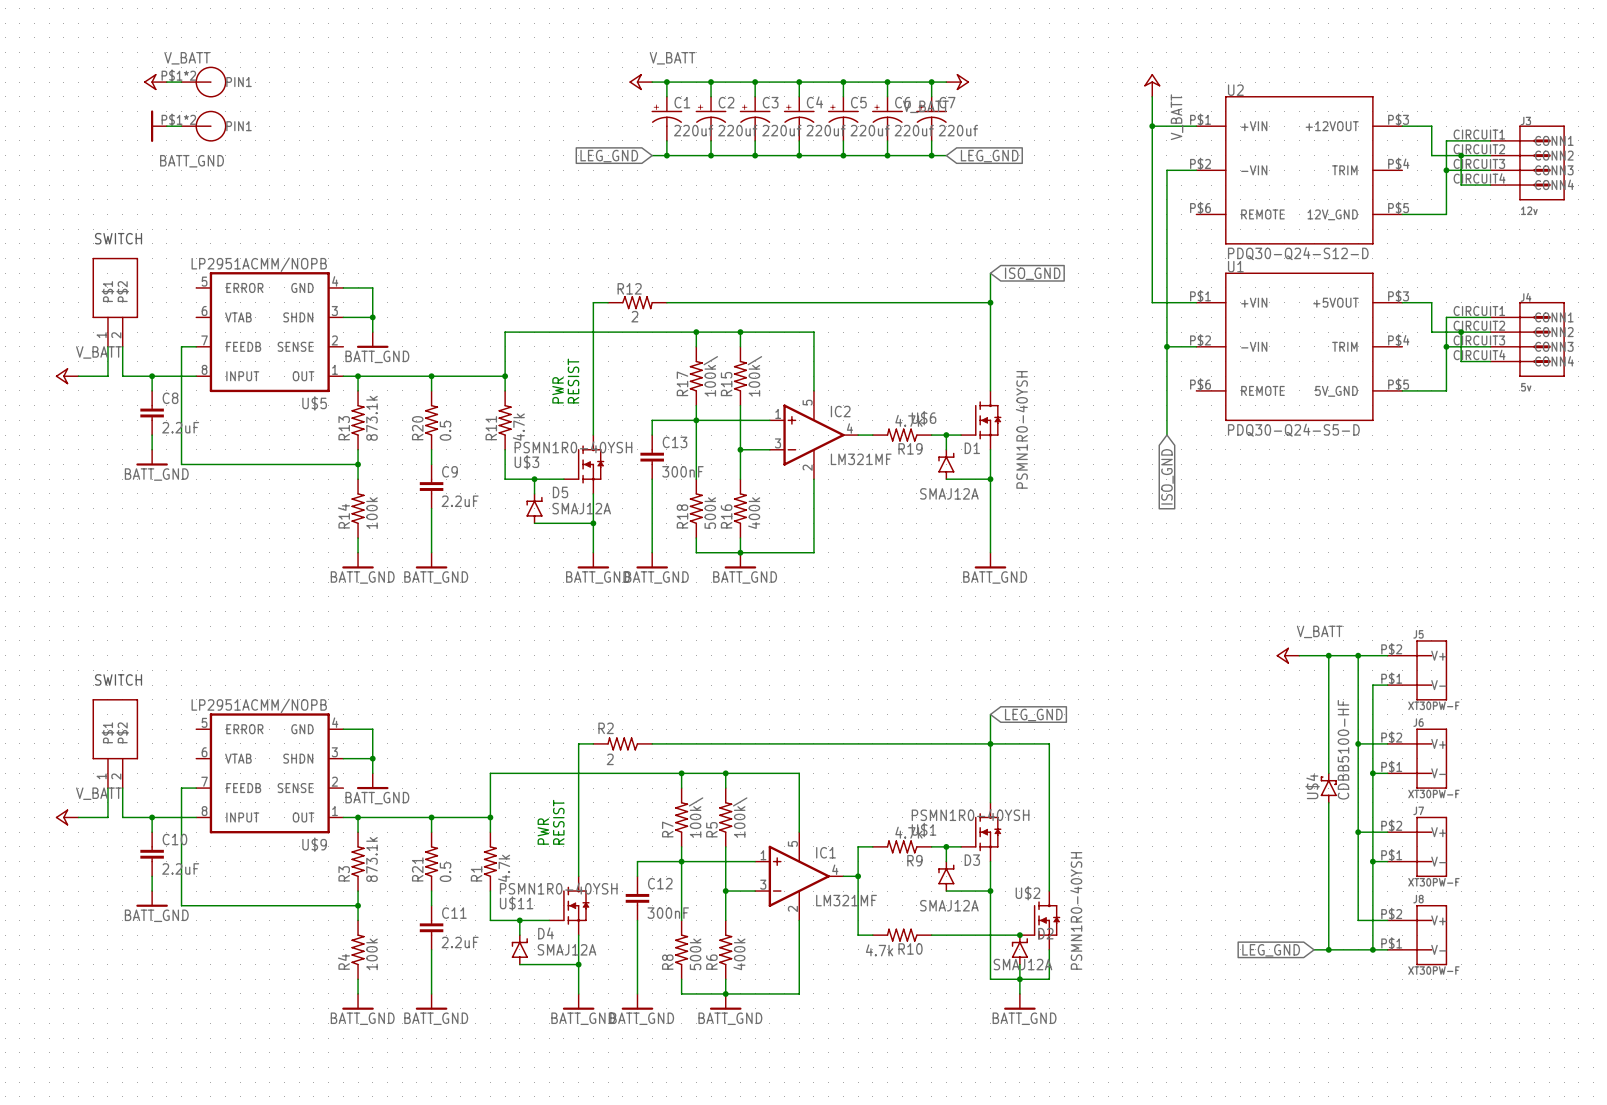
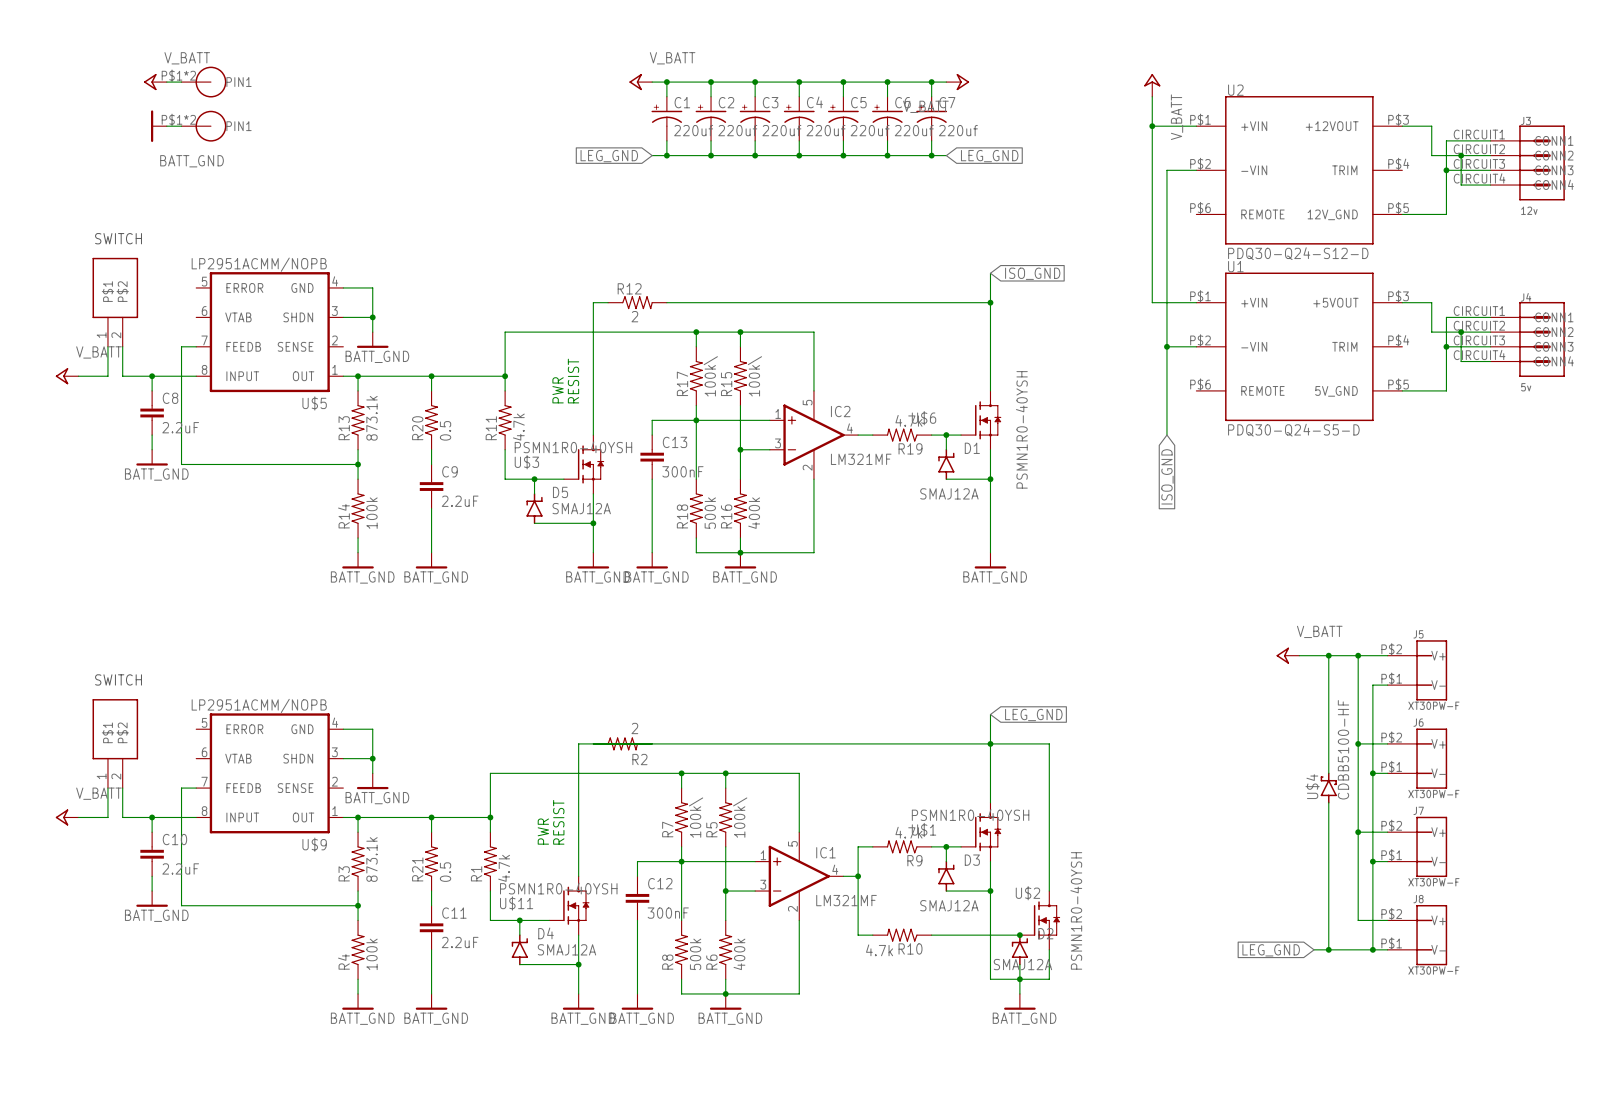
R2 rotation: 0° (622, 743) -> 180° (622, 743)

